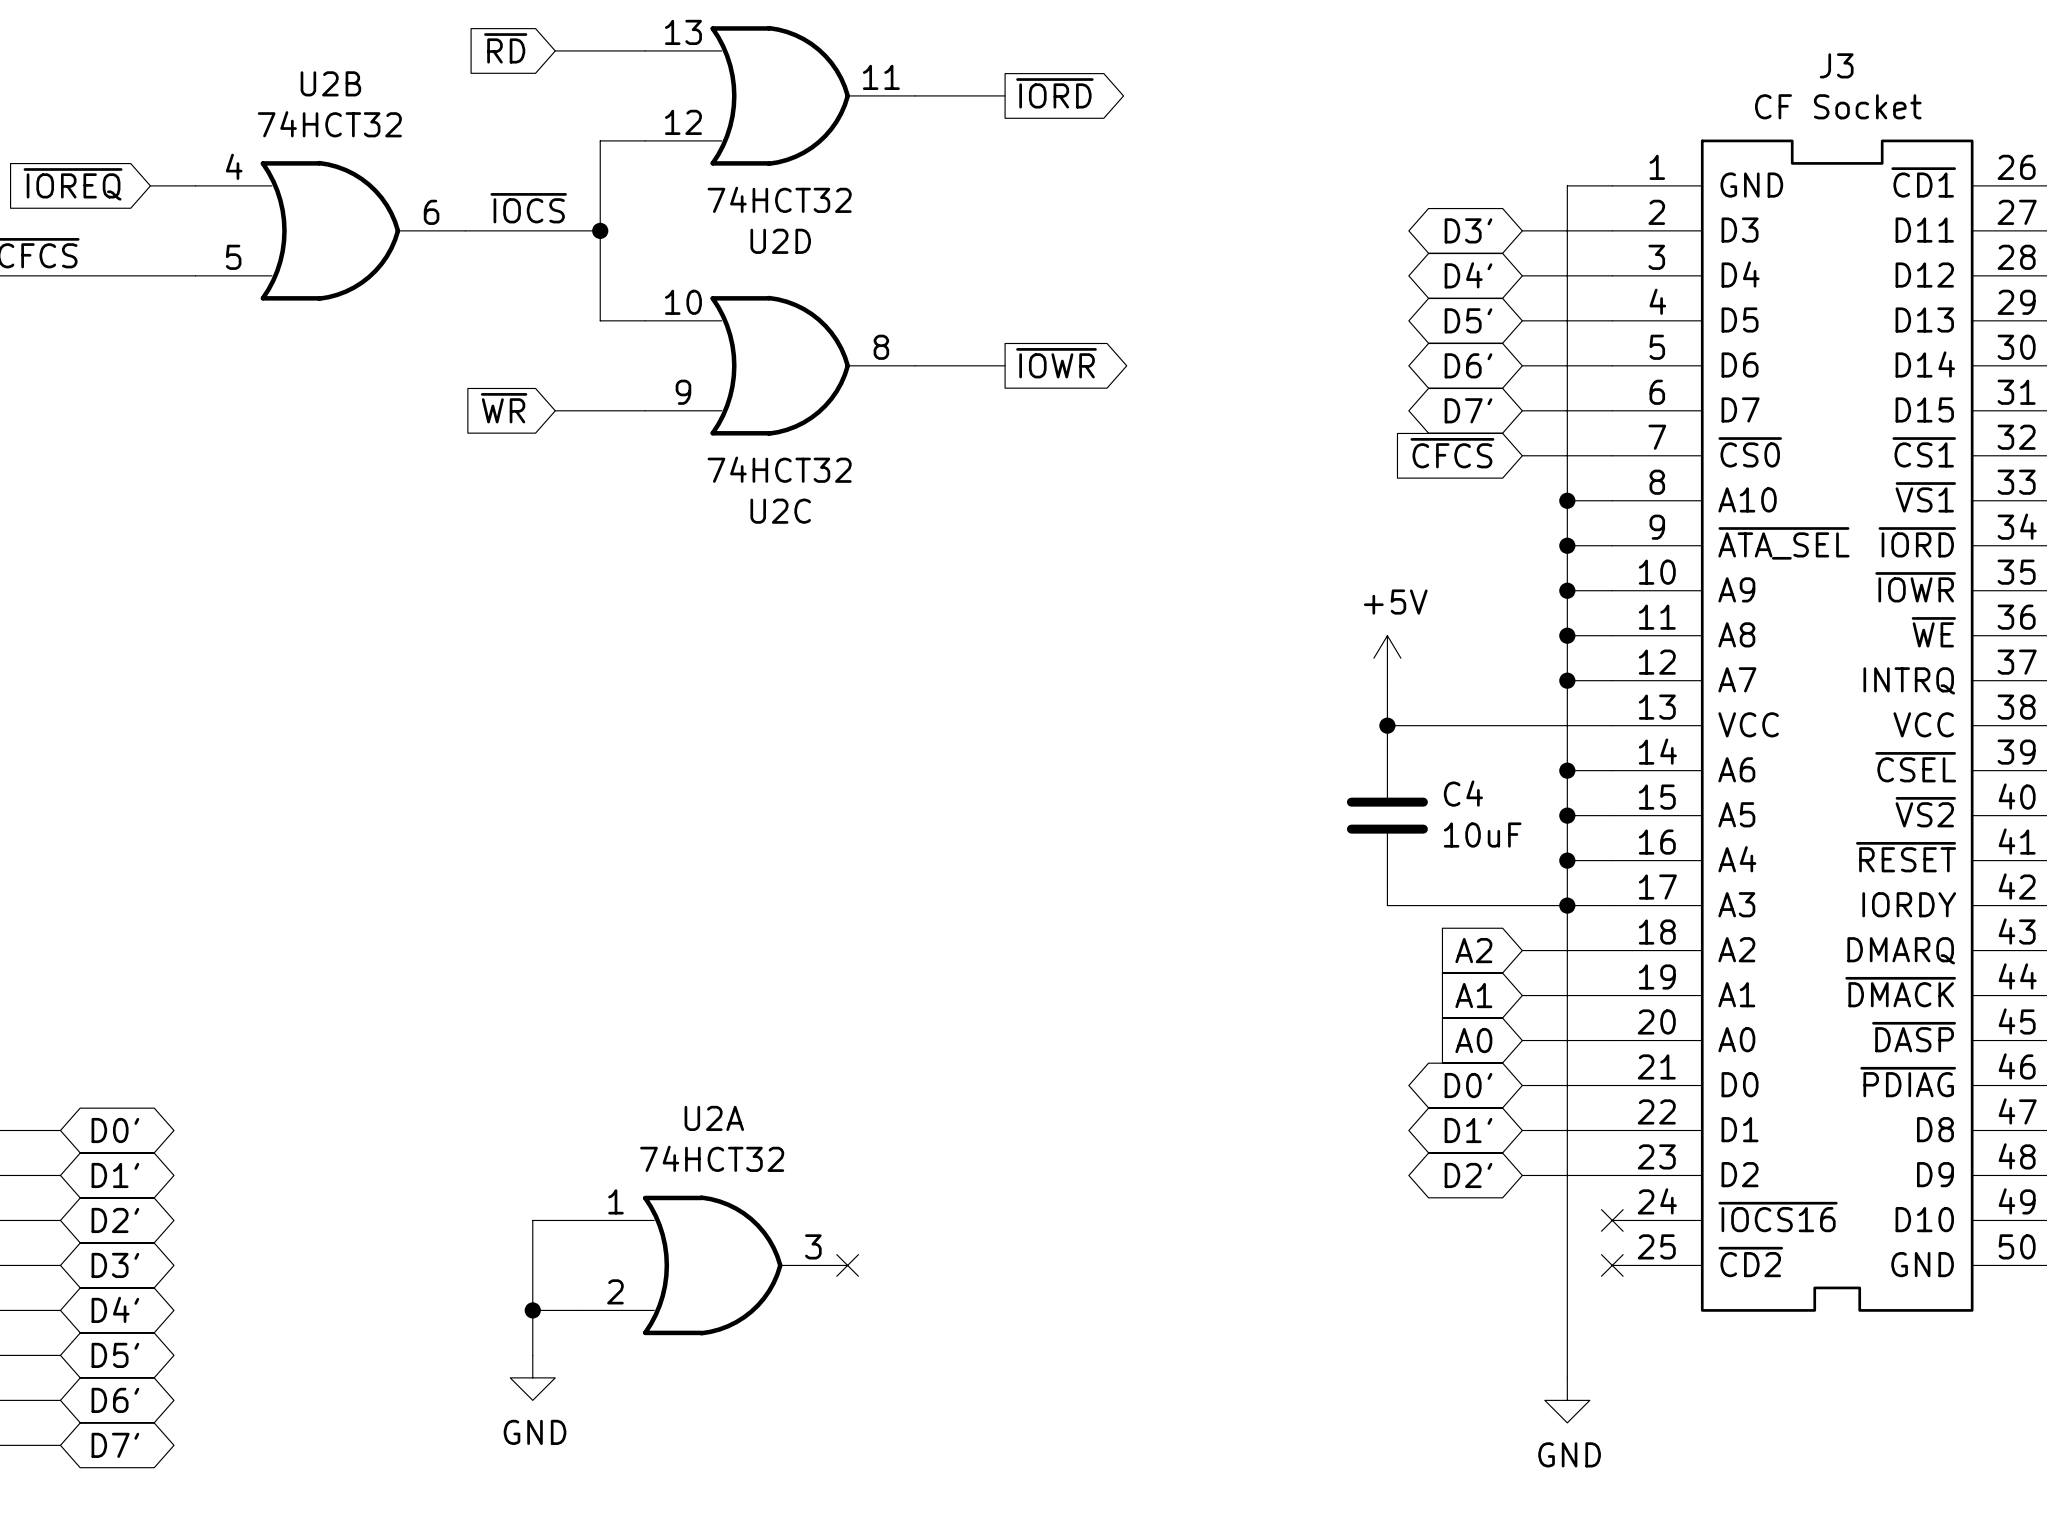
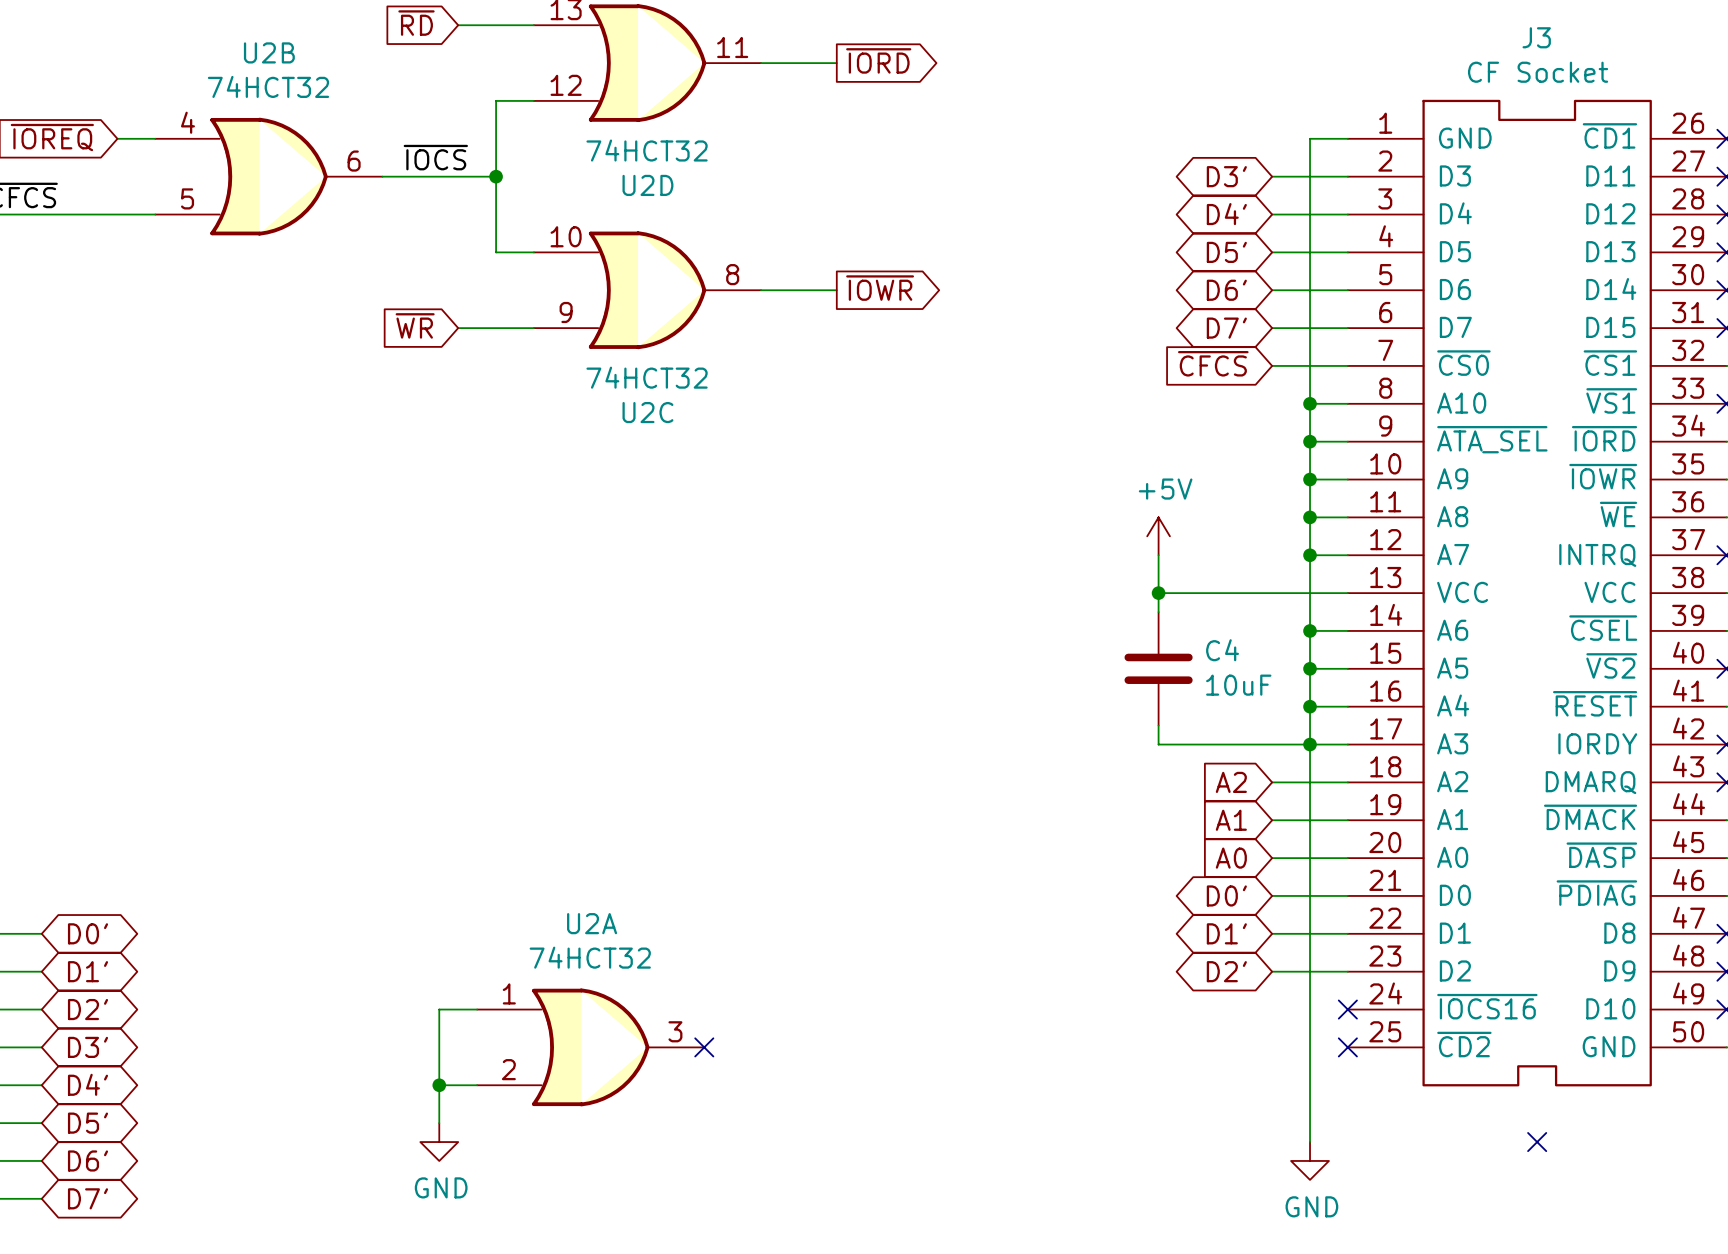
no-connect mark: none -> (1537, 1142)

